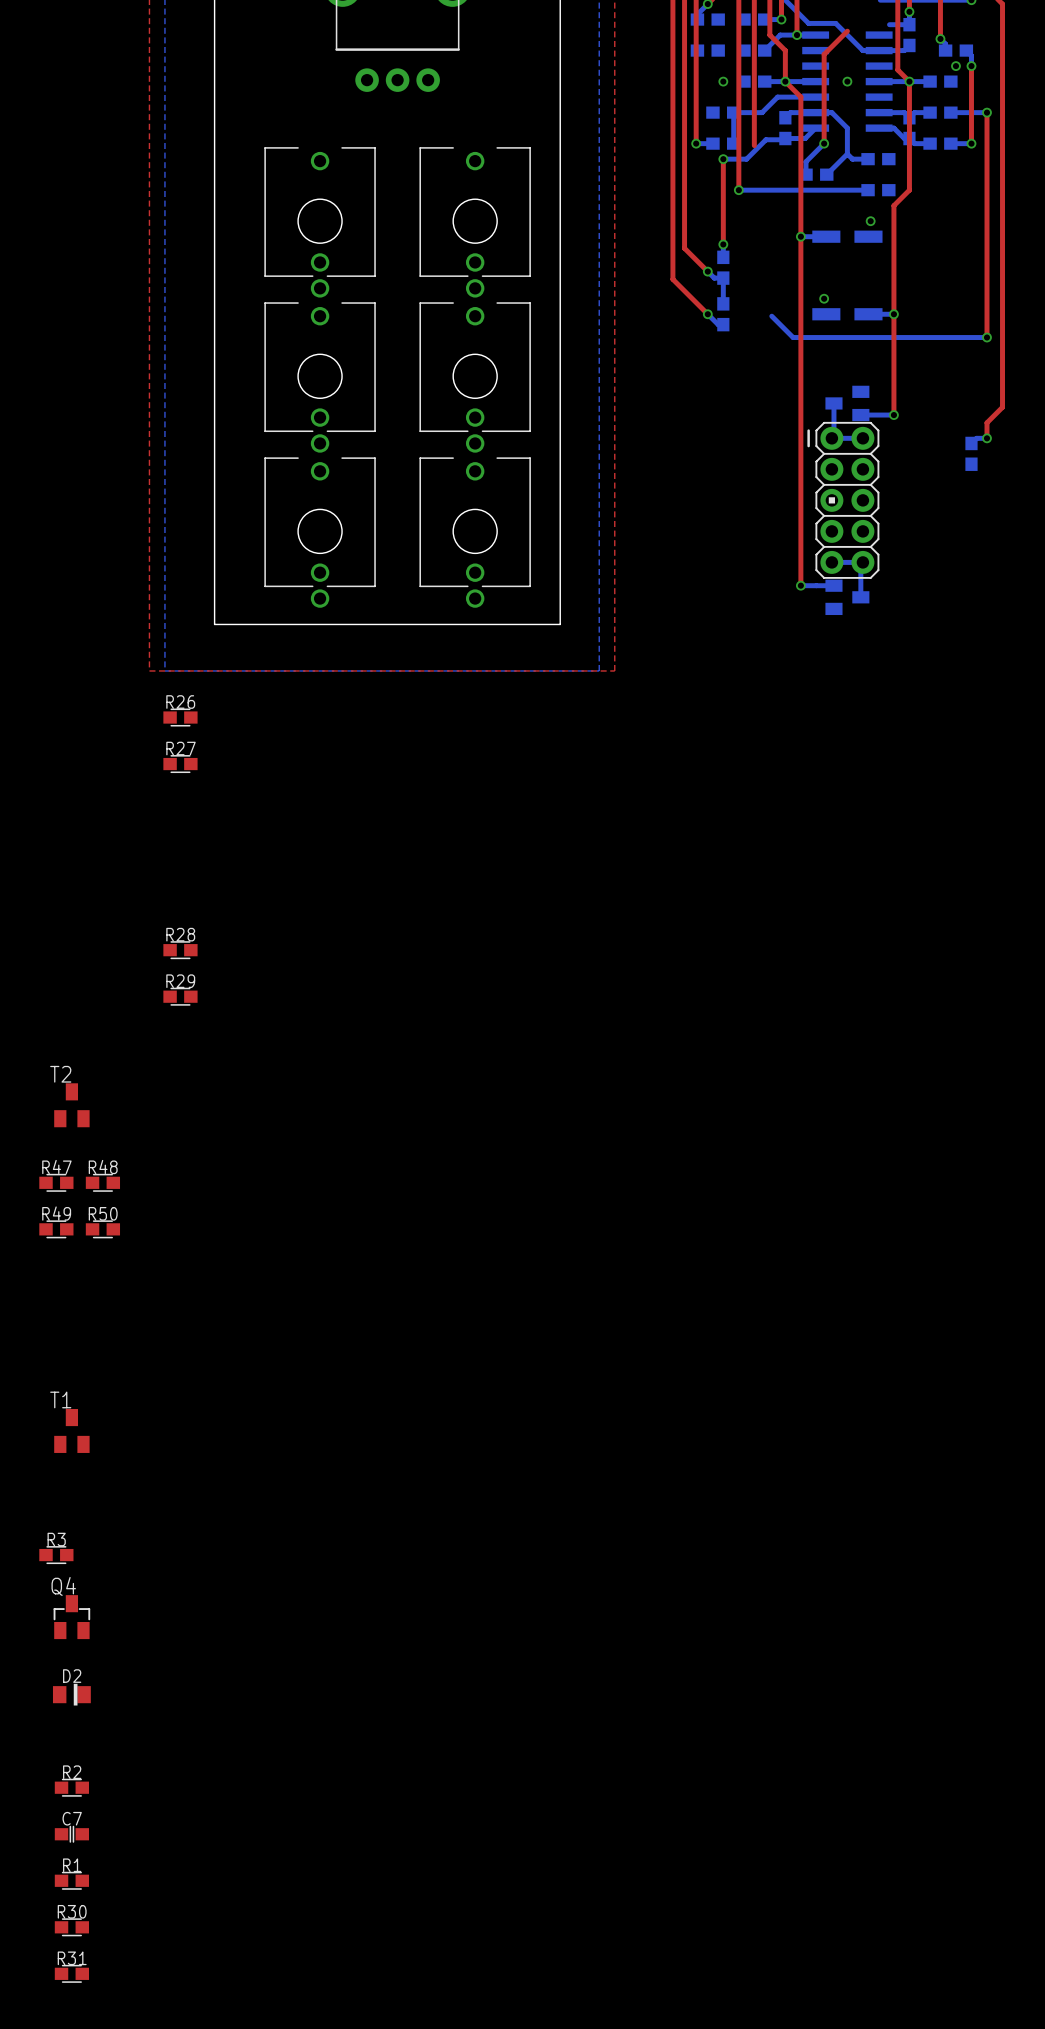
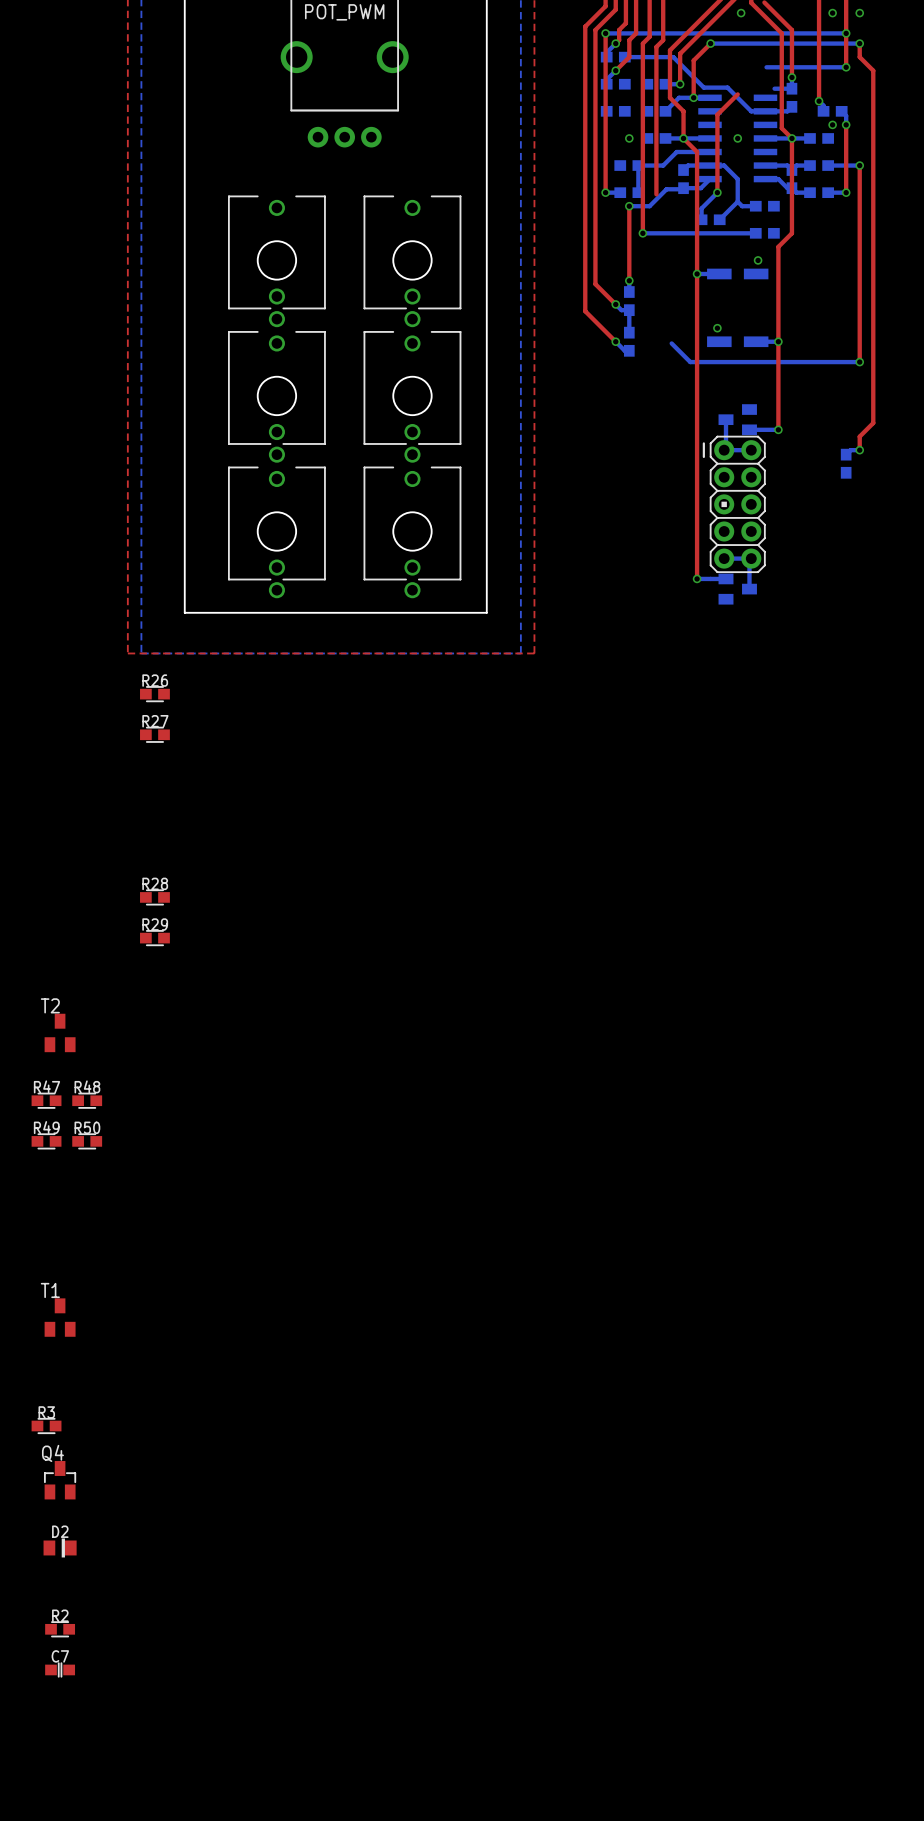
R1: (71, 1880) -> none
R30: (71, 1927) -> none
R31: (71, 1973) -> none

